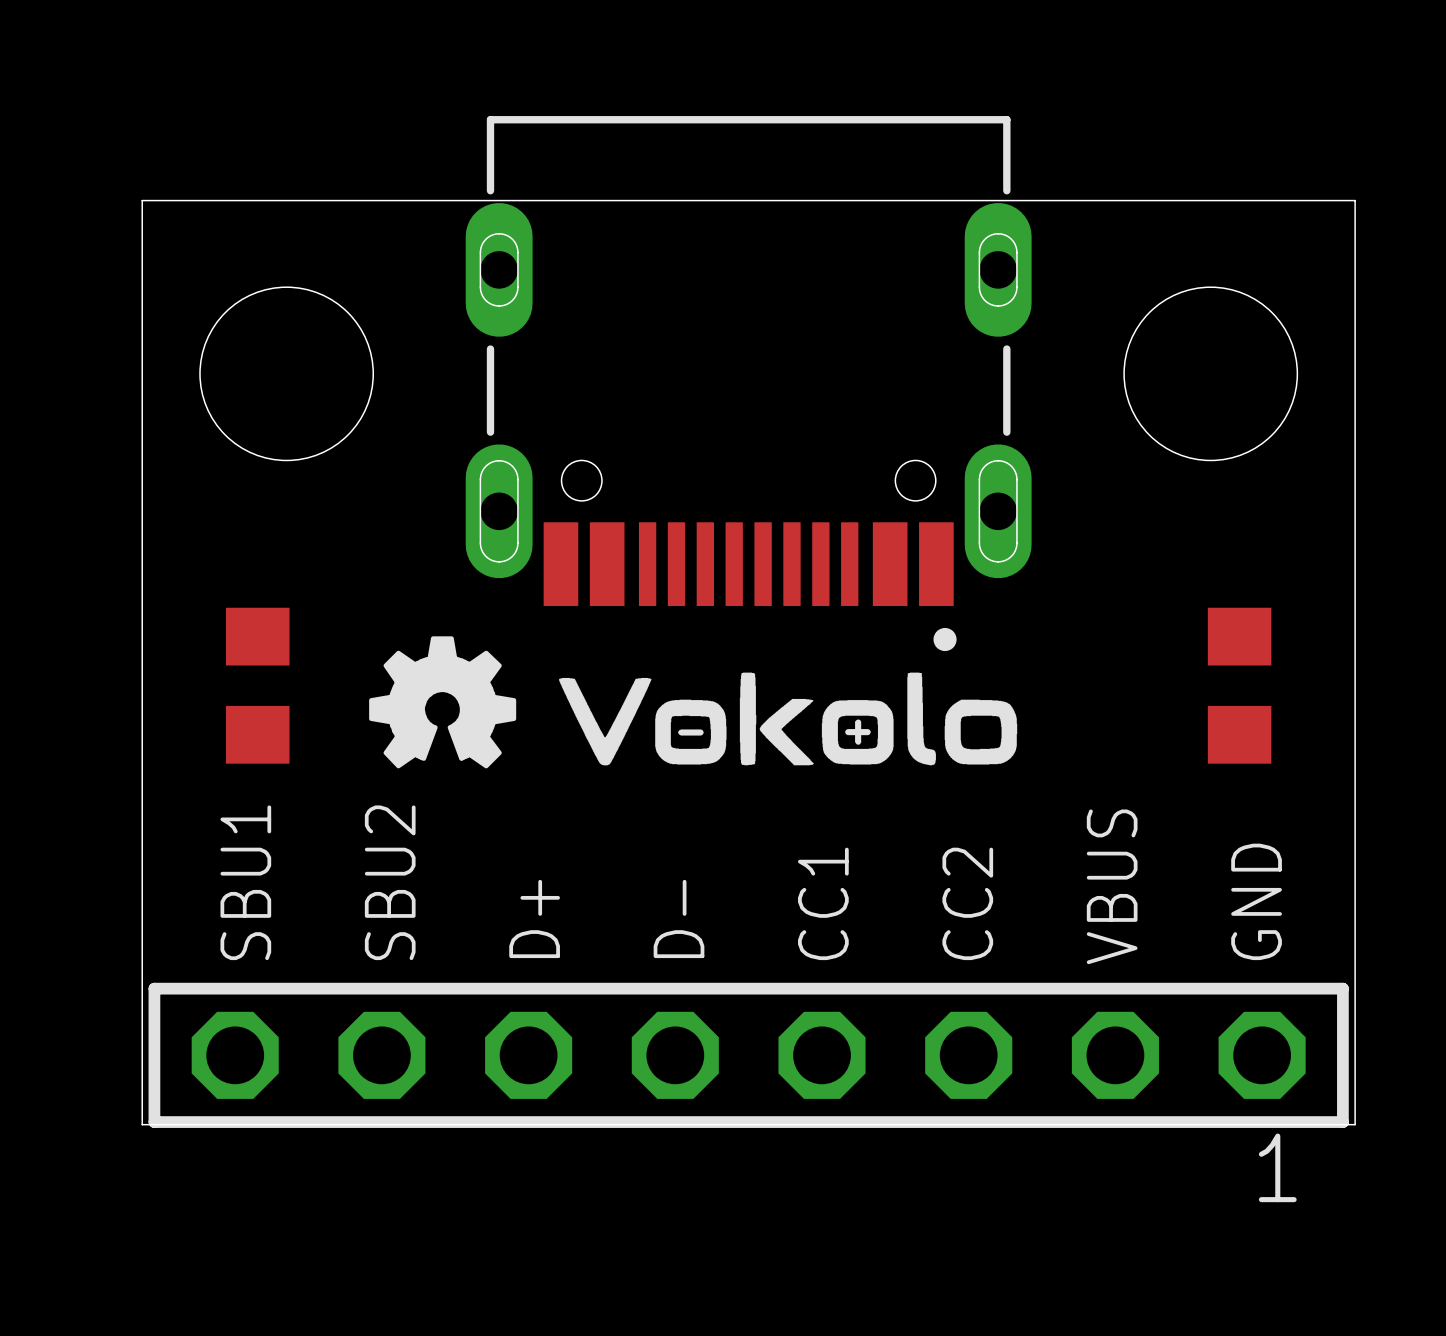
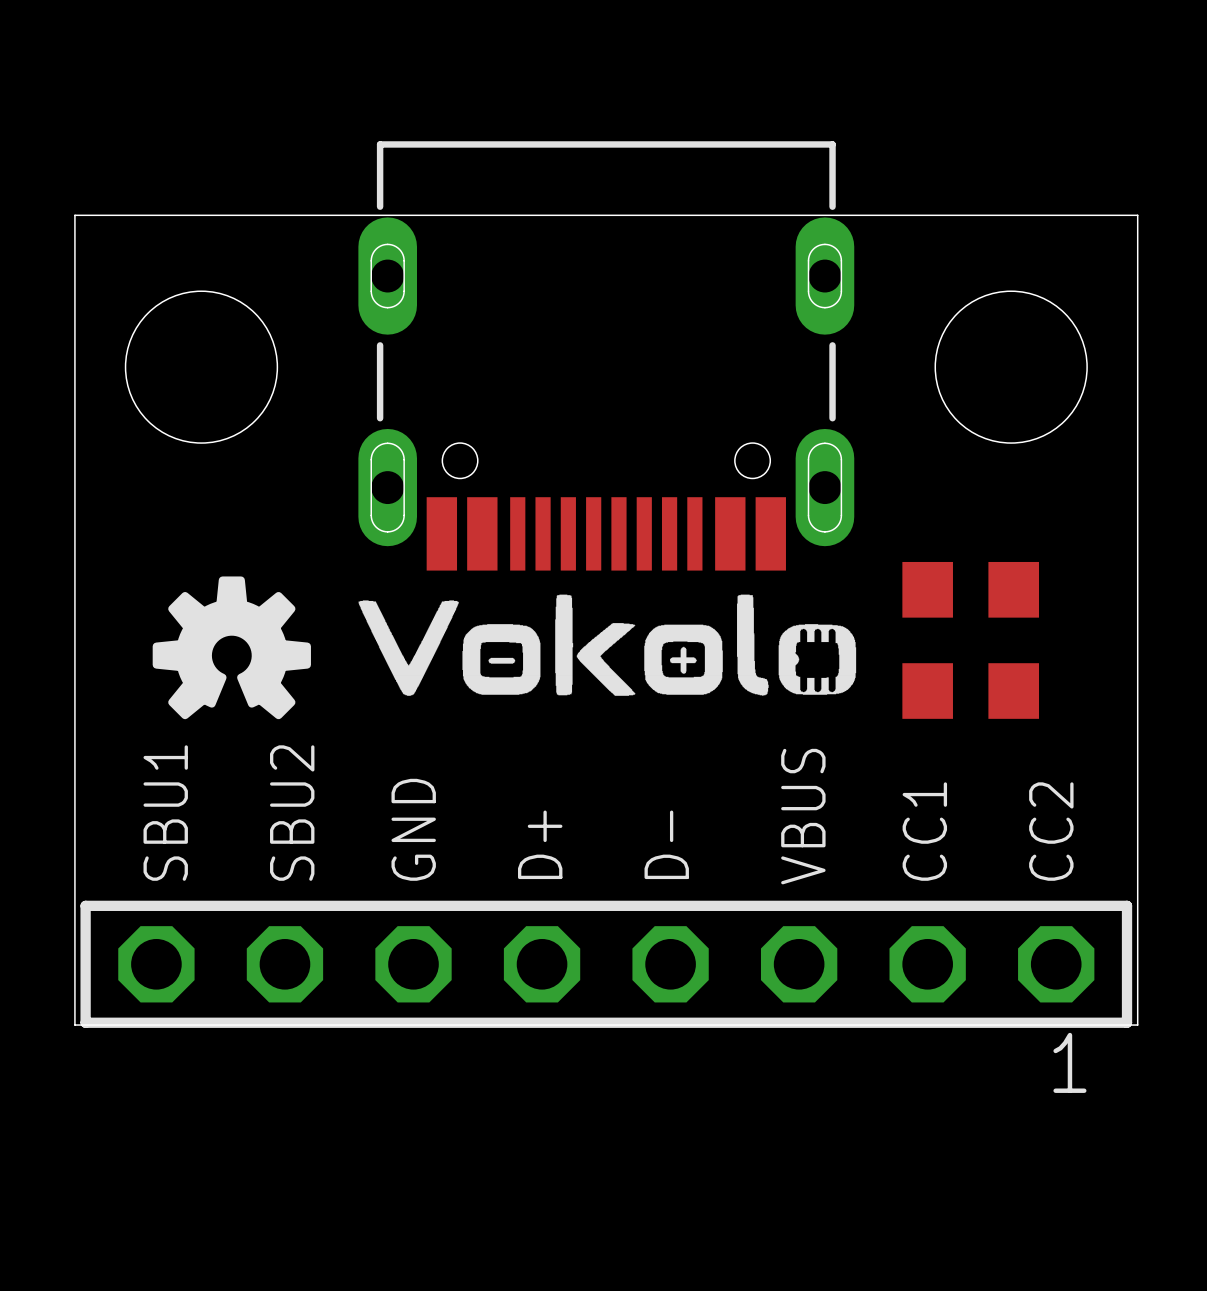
part footprint: [465, 116, 1032, 652] -> [358, 141, 855, 571]
drawing: none -> [152, 576, 311, 720]
part: none -> (970, 589)
drawing: [369, 636, 517, 769] -> none
drawing shape: [559, 672, 1018, 766] -> [358, 594, 857, 696]
part: (257, 685) -> none
part: (1239, 685) -> none
part: none -> (970, 691)
text: VBUS (1112, 886) -> CC1 (924, 831)
text: GND (1256, 901) -> CC2 (1051, 831)
text: CC1 (823, 903) -> D- (666, 844)
text: CC2 (967, 903) -> VBUS (803, 816)
text: D+ (534, 918) -> GND (413, 829)
text: D- (678, 918) -> D+ (540, 844)

